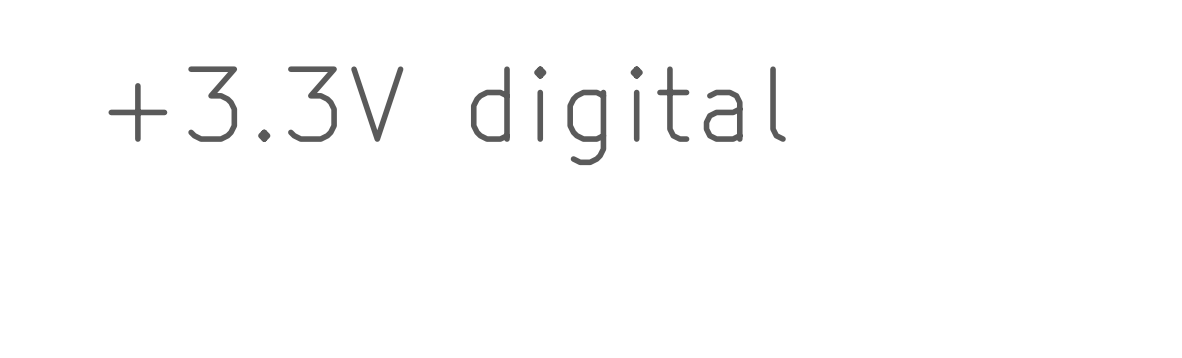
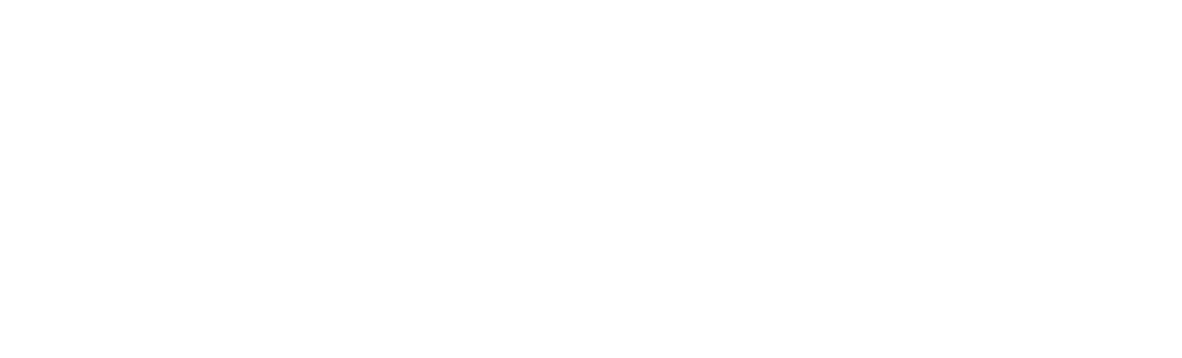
text: +3.3V digital (447, 115) -> none

